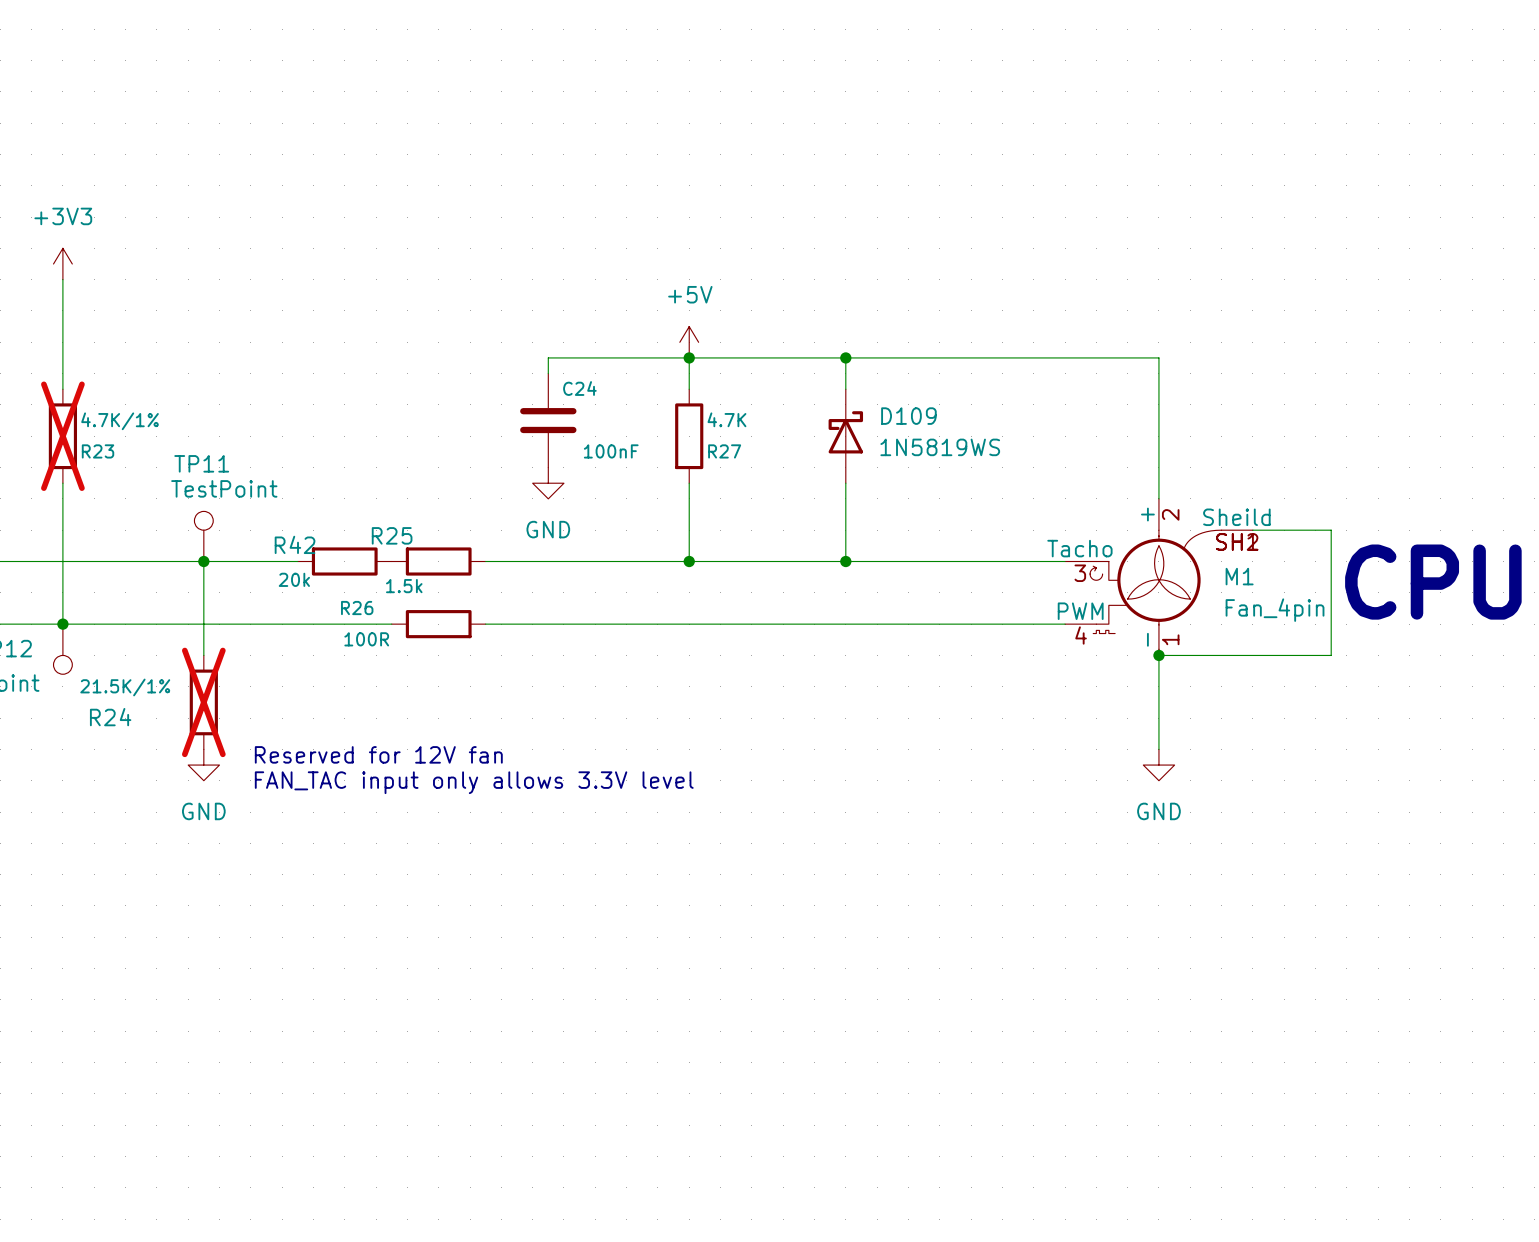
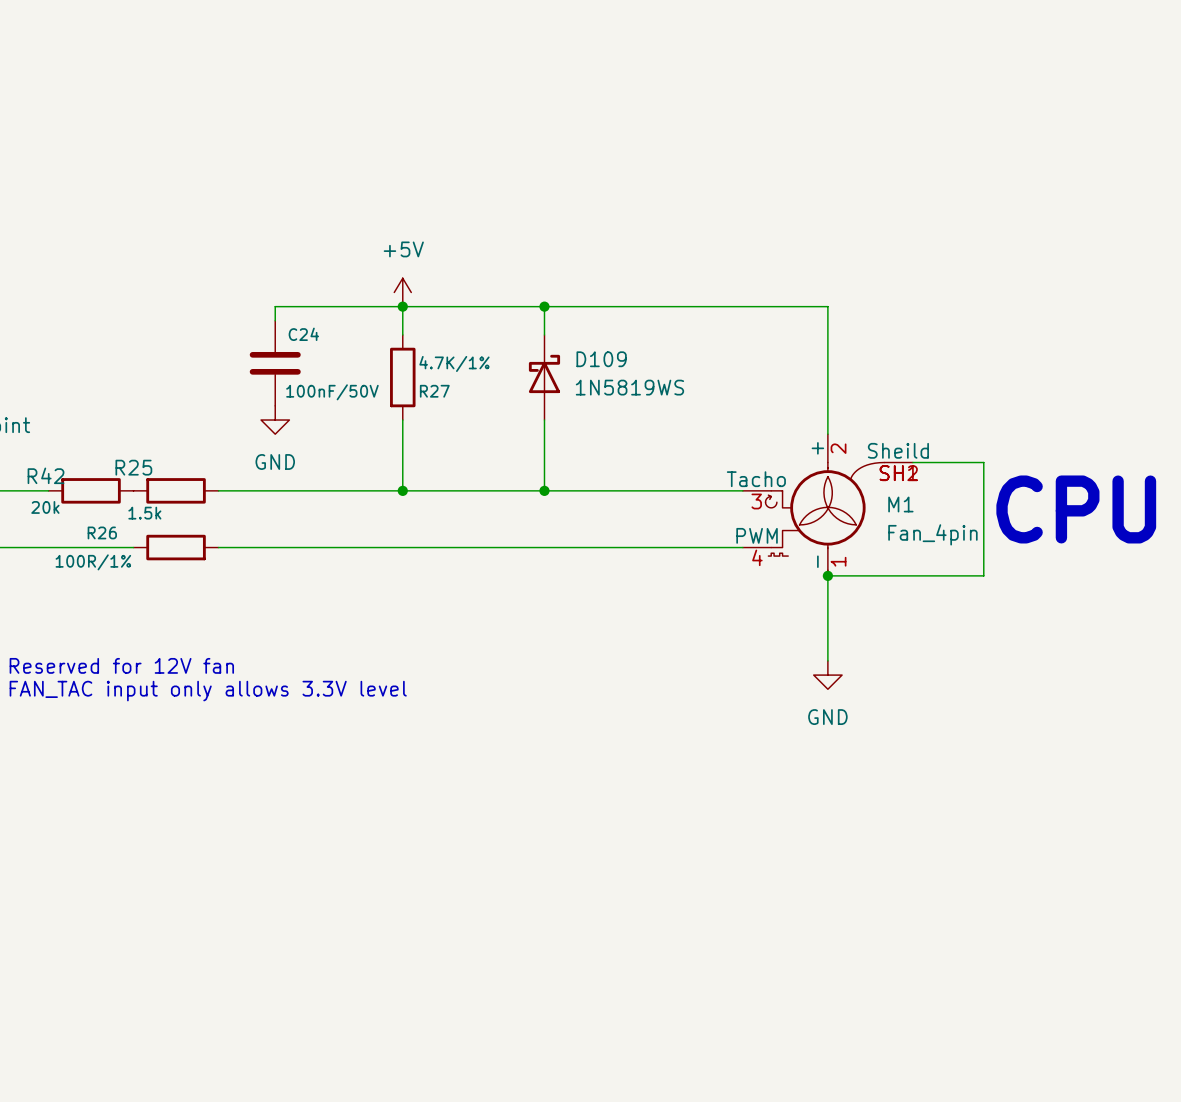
R27 value: 4.7K (726, 419) -> 4.7K/1% (454, 363)
C24 value: 100nF (611, 451) -> 100nF/50V (332, 392)
R26 value: 100R (366, 639) -> 100R/1% (93, 562)

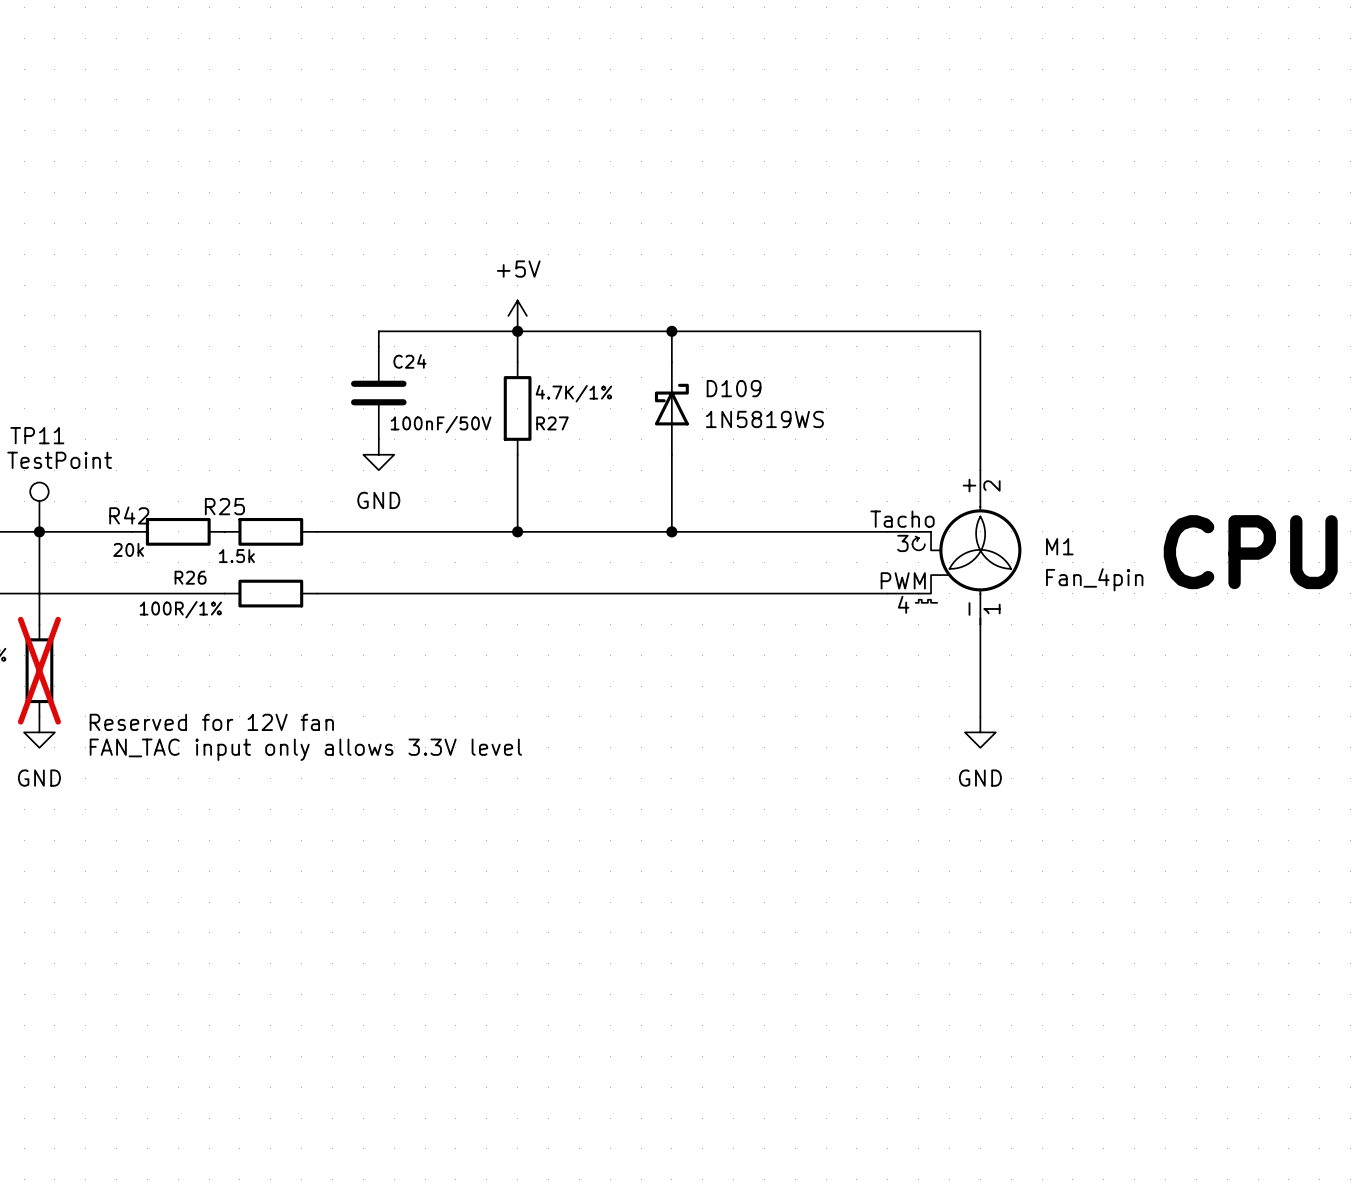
M1 symbol: [742, 434, 913, 576] -> [887, 470, 1022, 625]
wire: (912, 462) (983, 462) (983, 575) (827, 575) -> none
junction: (827, 575) -> none

